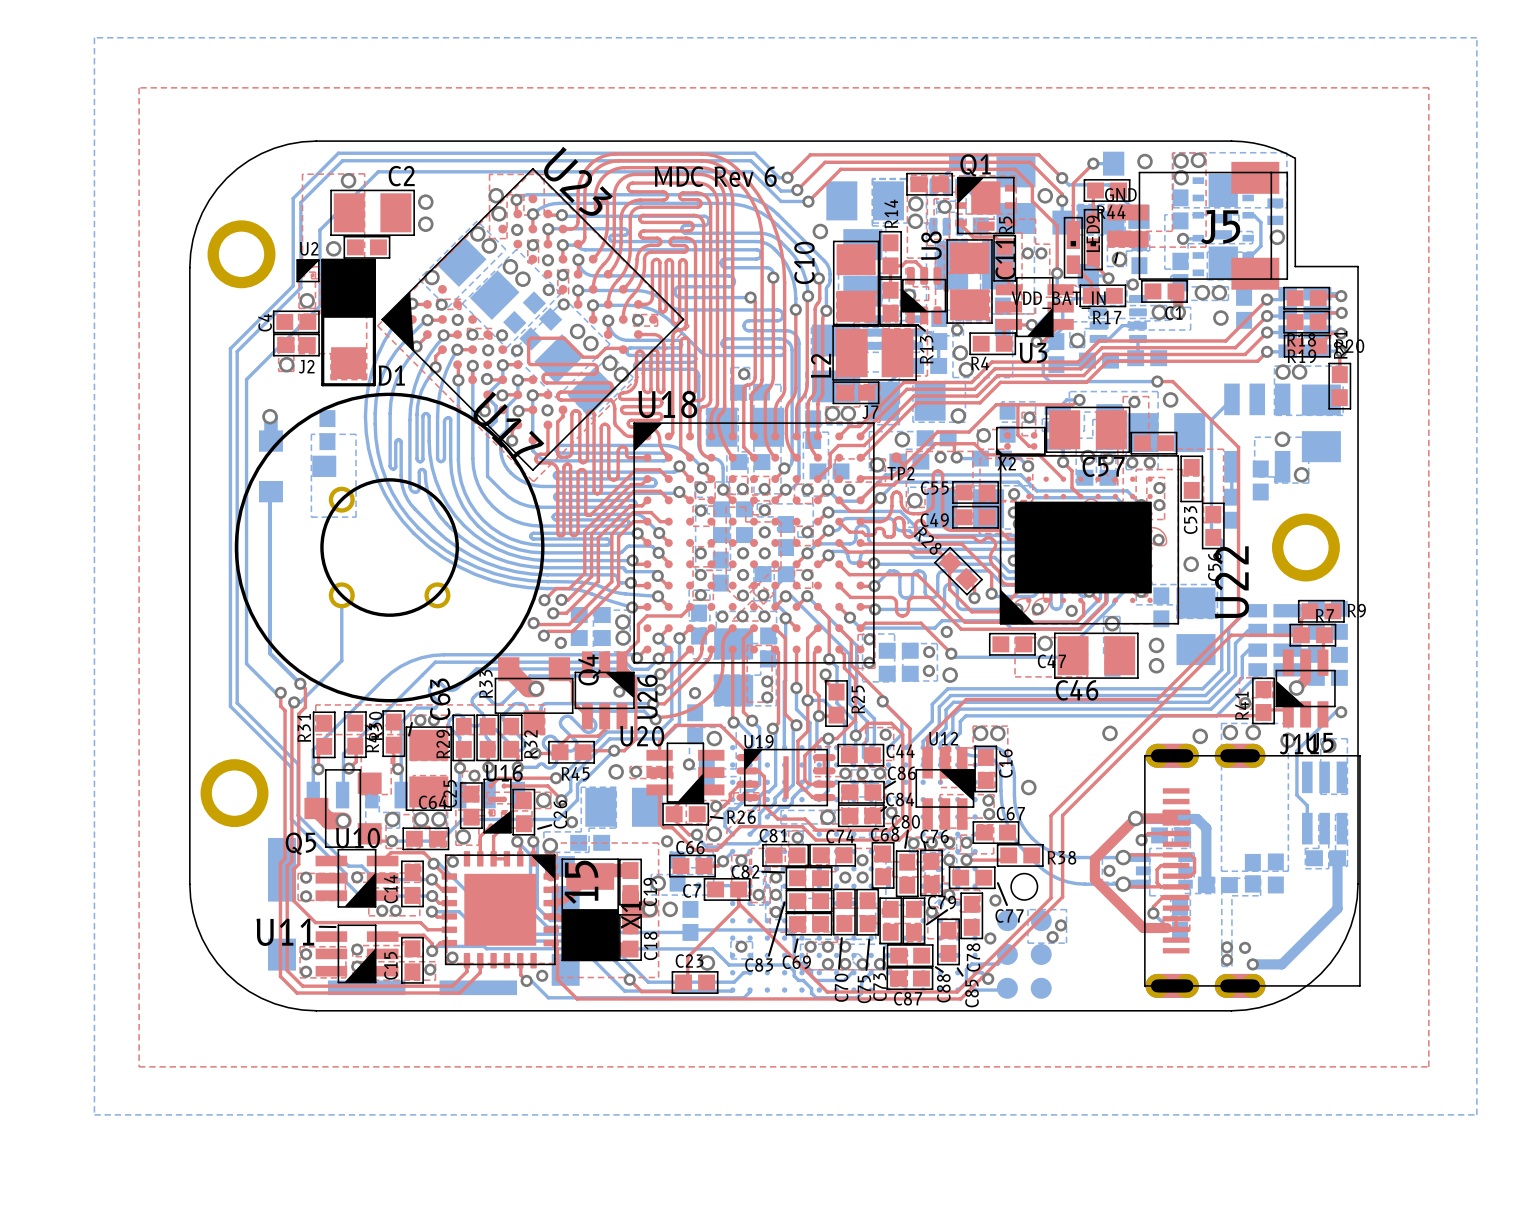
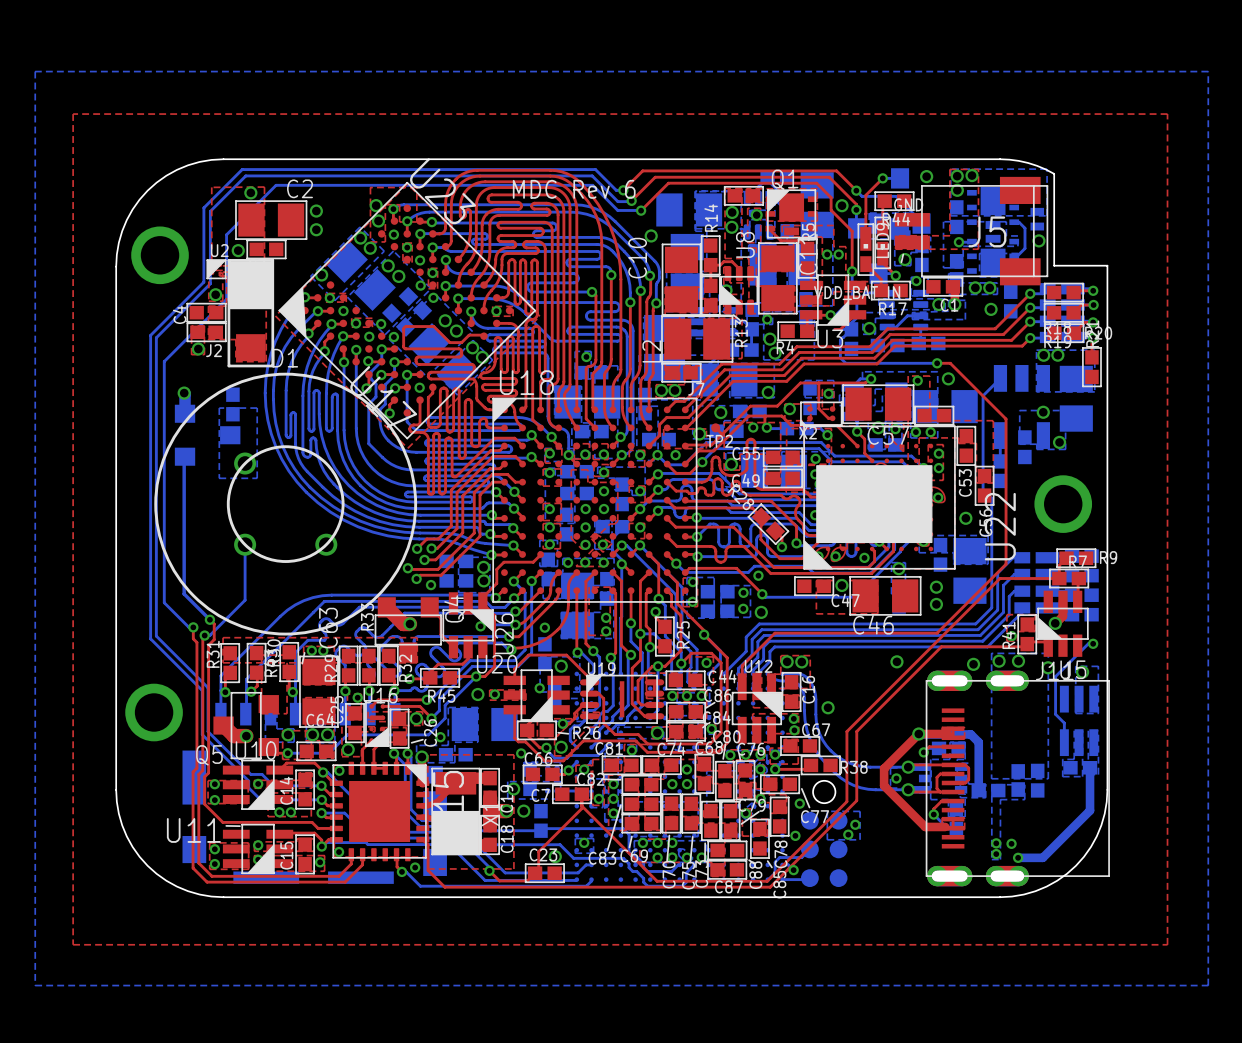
via: (1036, 341) -> none

